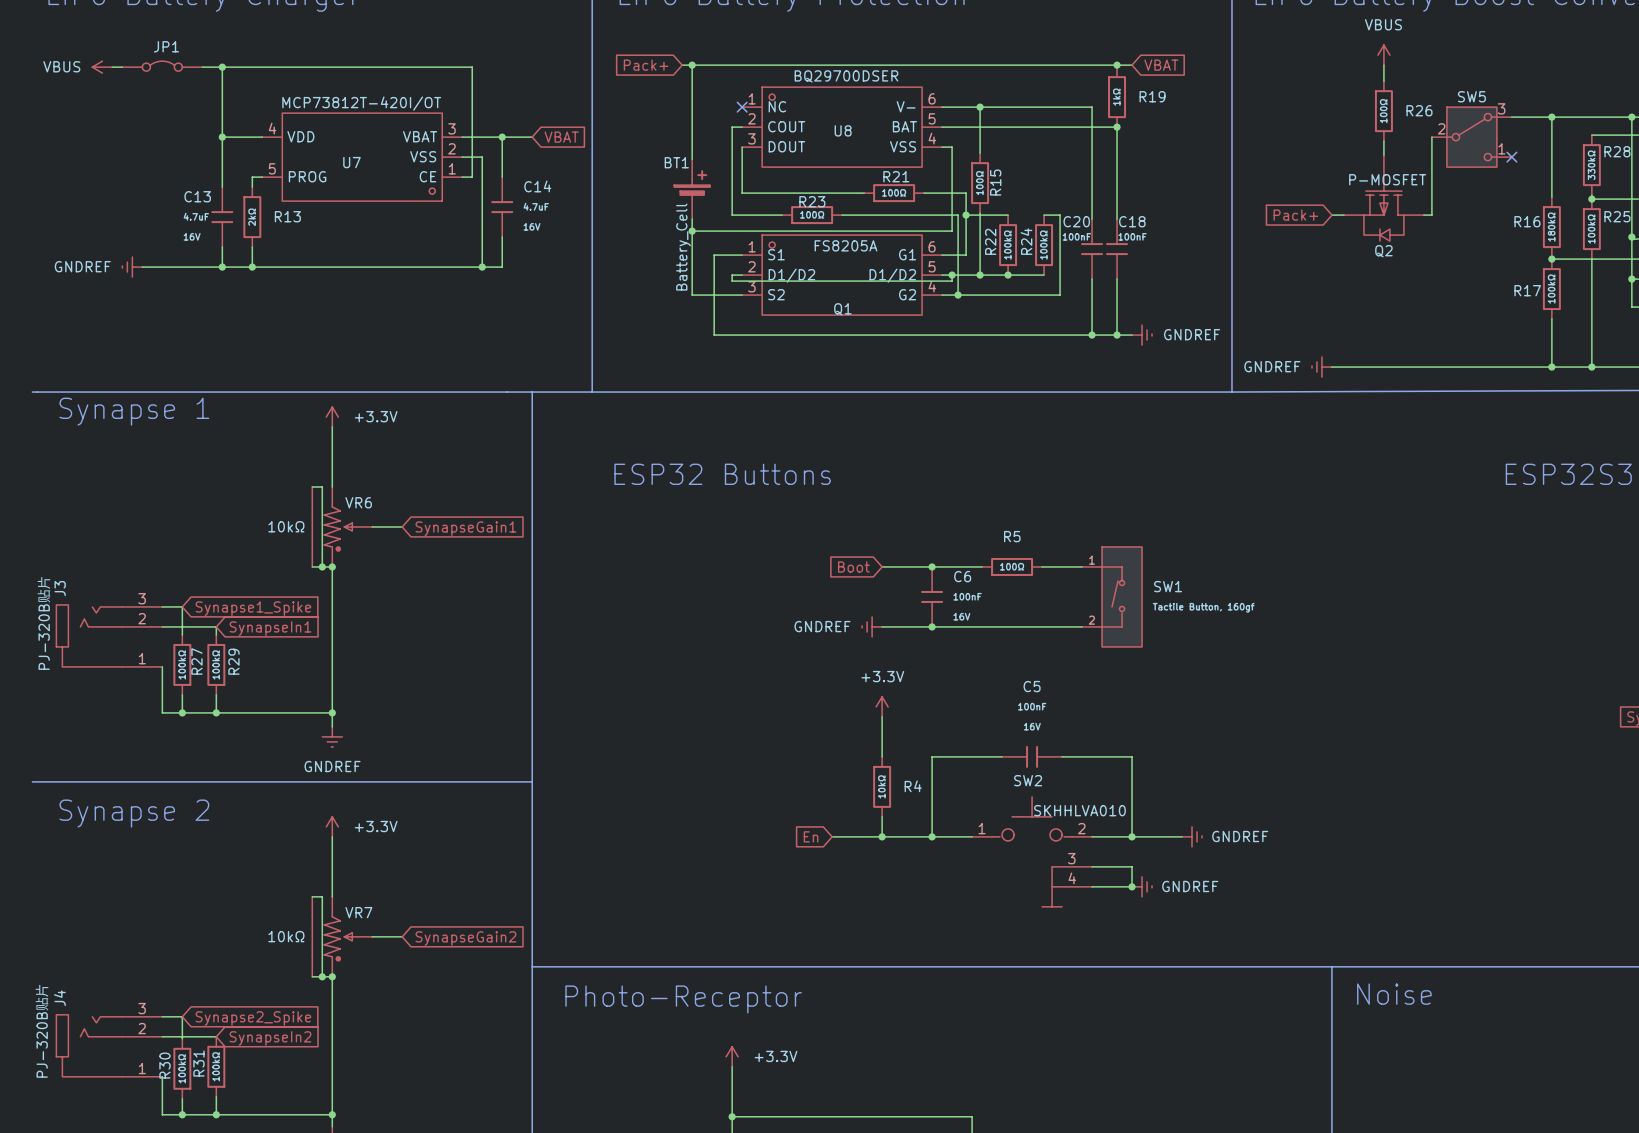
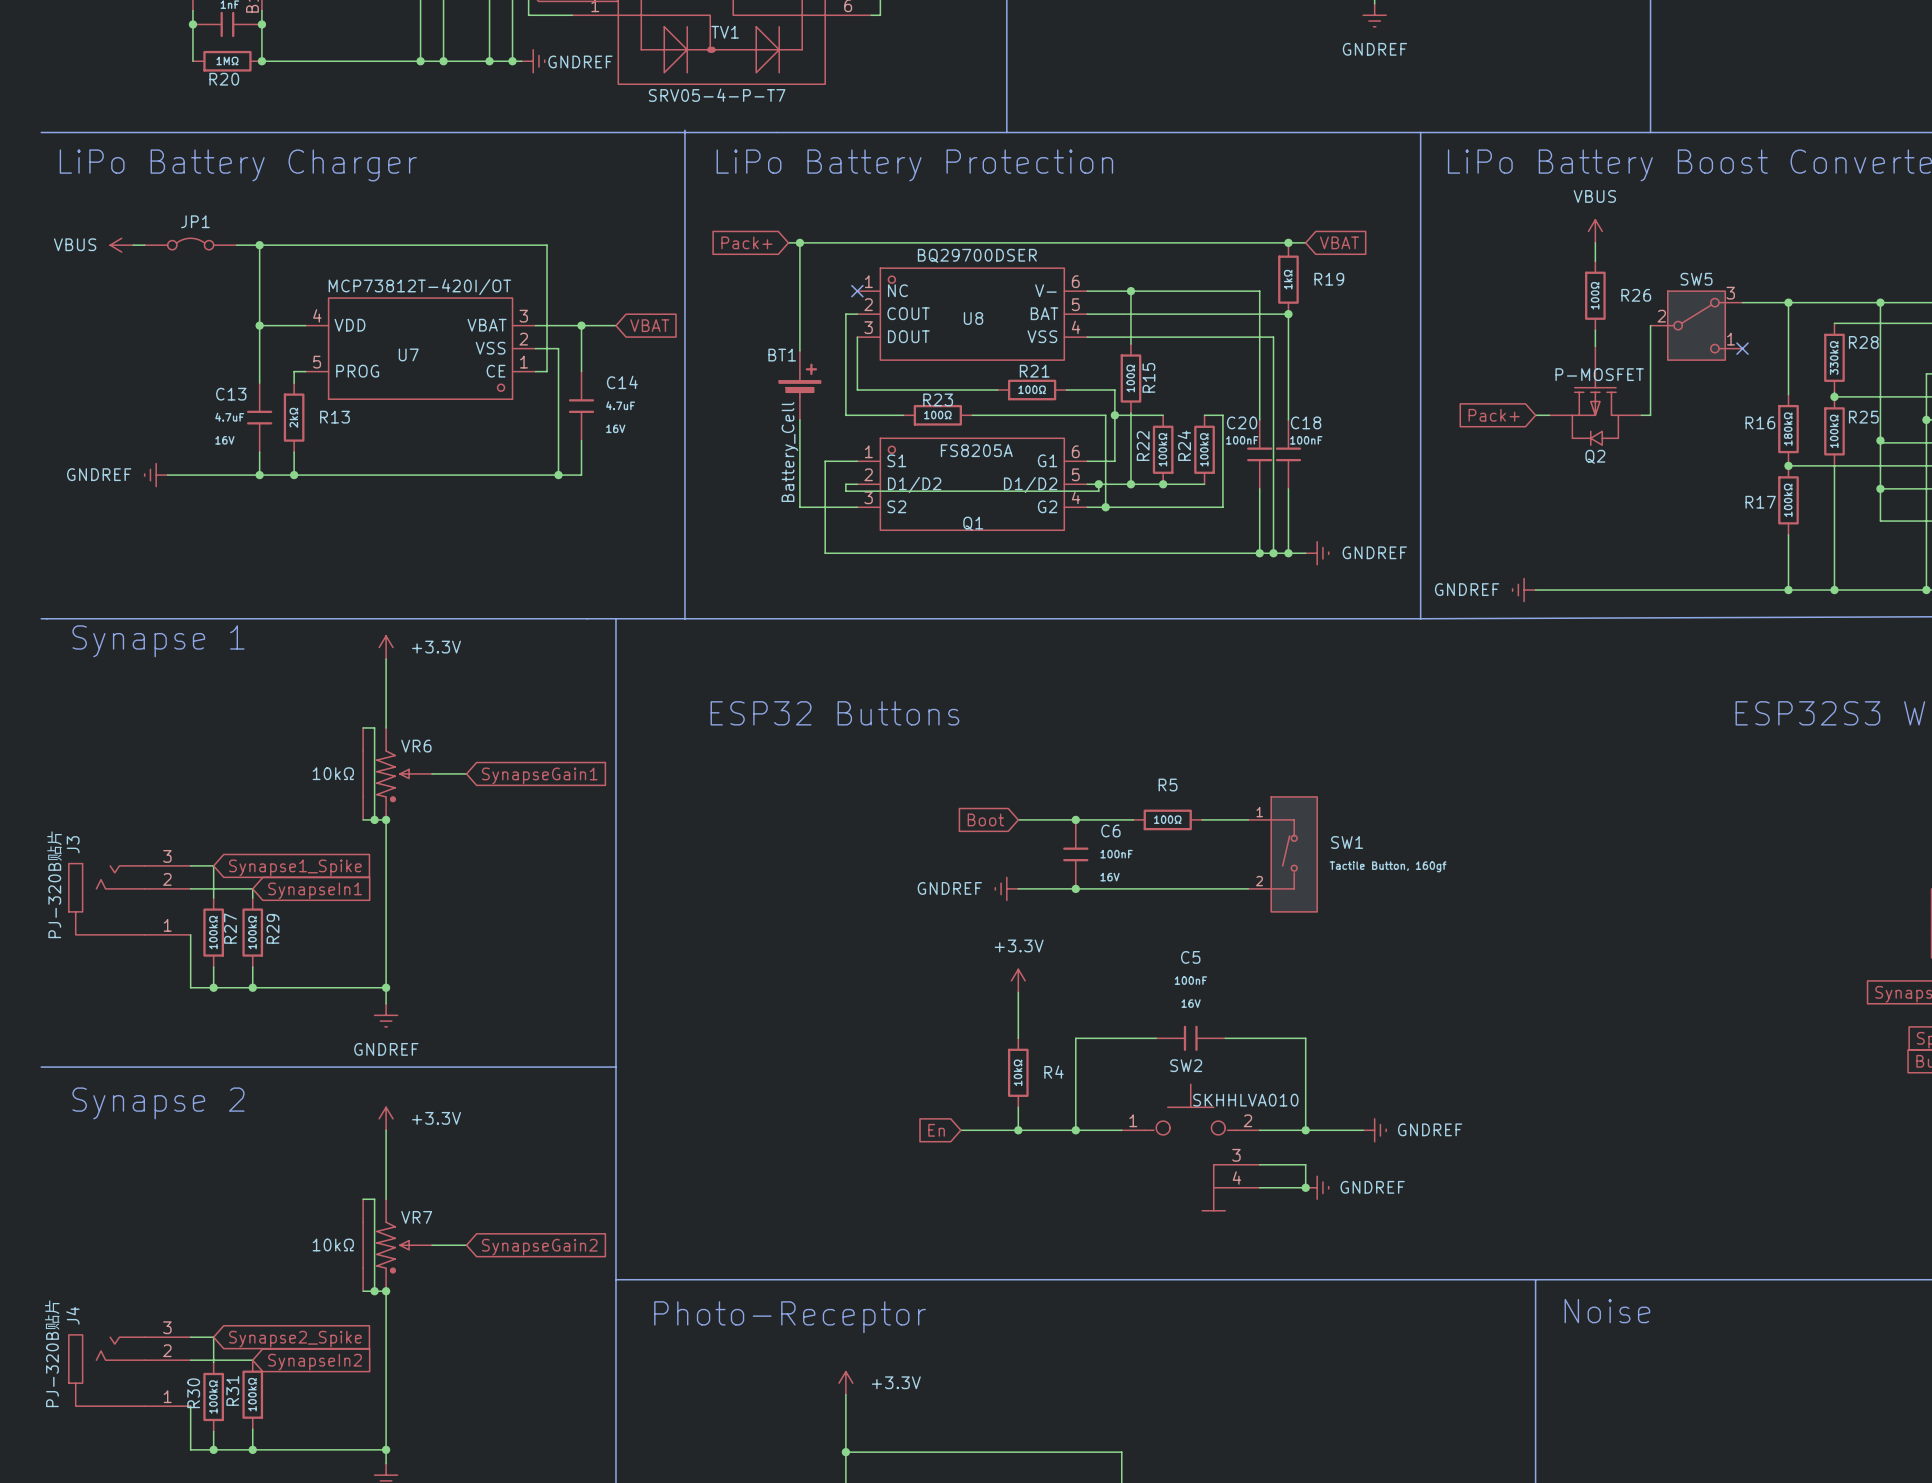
wire: (952, 147) (952, 231) (692, 231) -> (1098, 337) (1273, 337) (1273, 553)
junction: (692, 231) -> none
junction: none -> (1273, 553)

